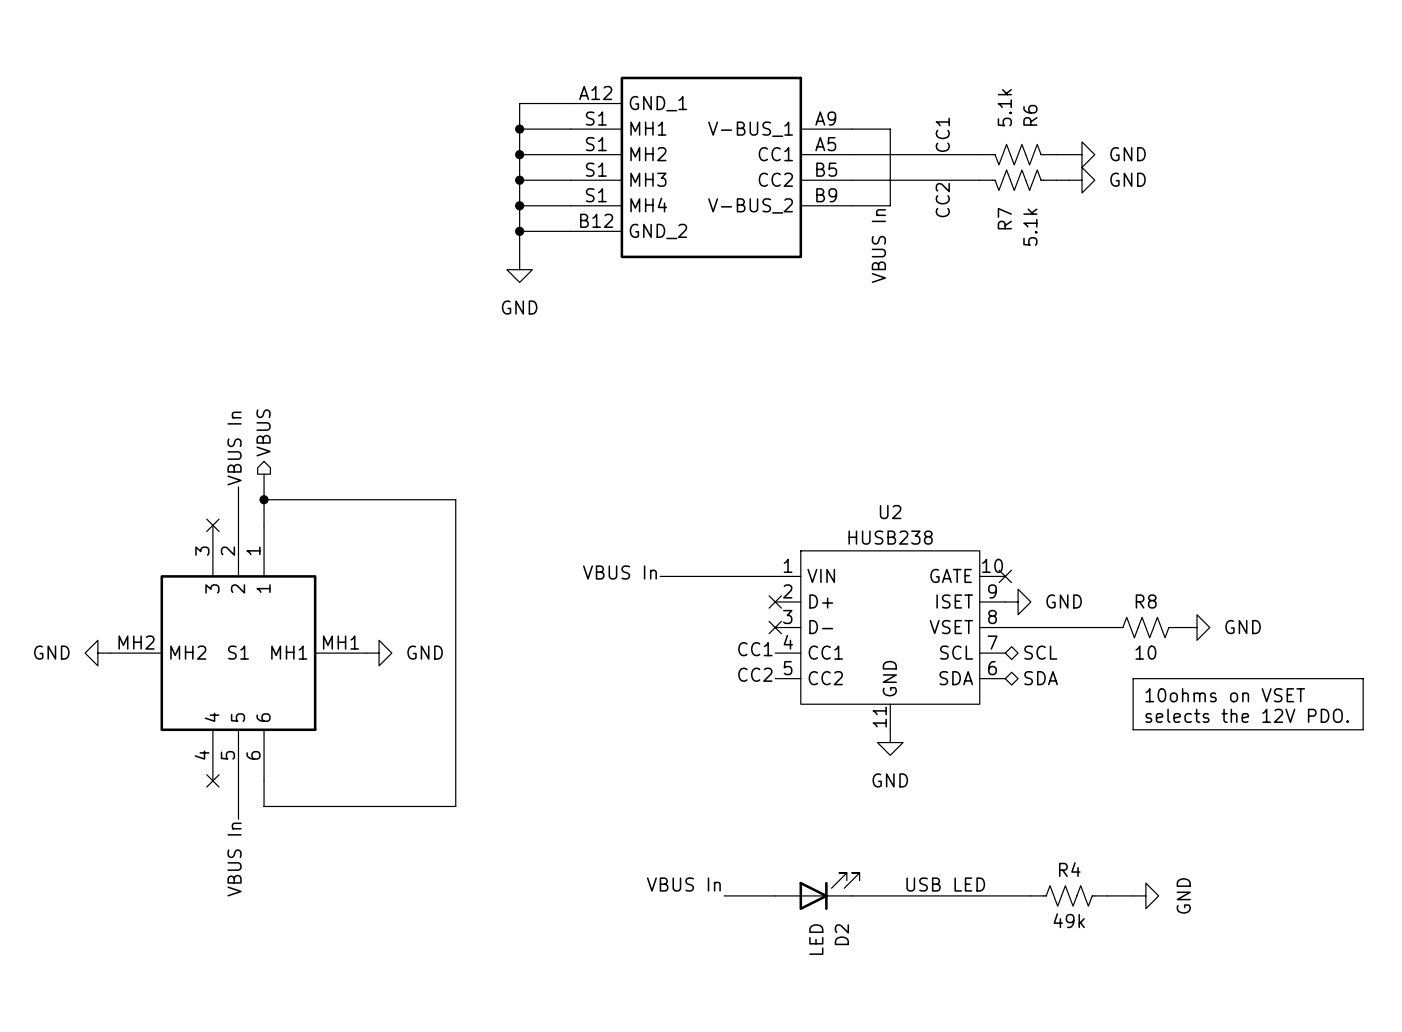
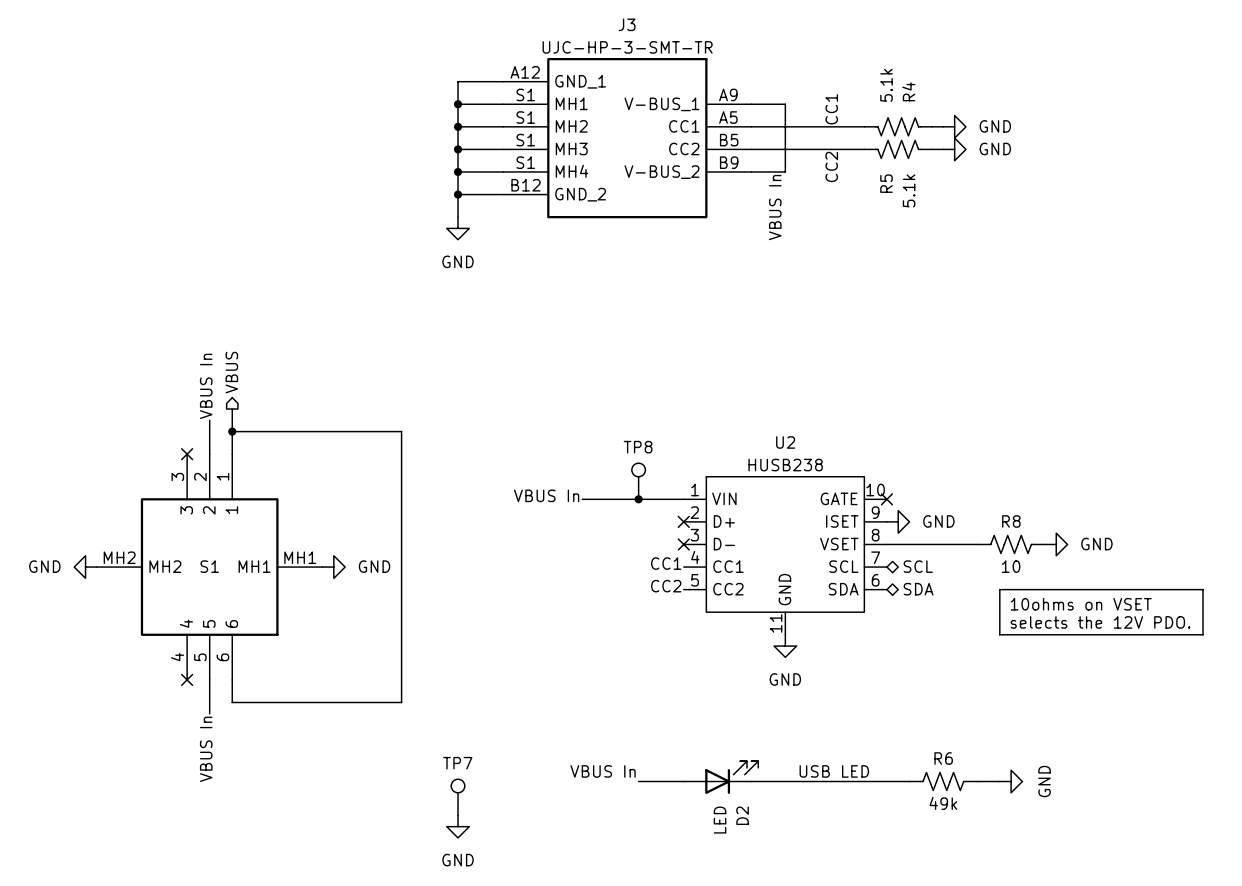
J3 name: none -> J3 (627, 24)
J3 value: none -> UJC-HP-3-SMT-TR (627, 47)
R6 name: R6 (1030, 115) -> R4 (908, 91)
R7 name: R7 (1004, 218) -> R5 (886, 183)
TP8: none -> (638, 481)
junction: none -> (638, 499)
R4 name: R4 (1069, 869) -> R6 (943, 758)
TP7: none -> (458, 797)
power symbol: none -> GND (458, 826)

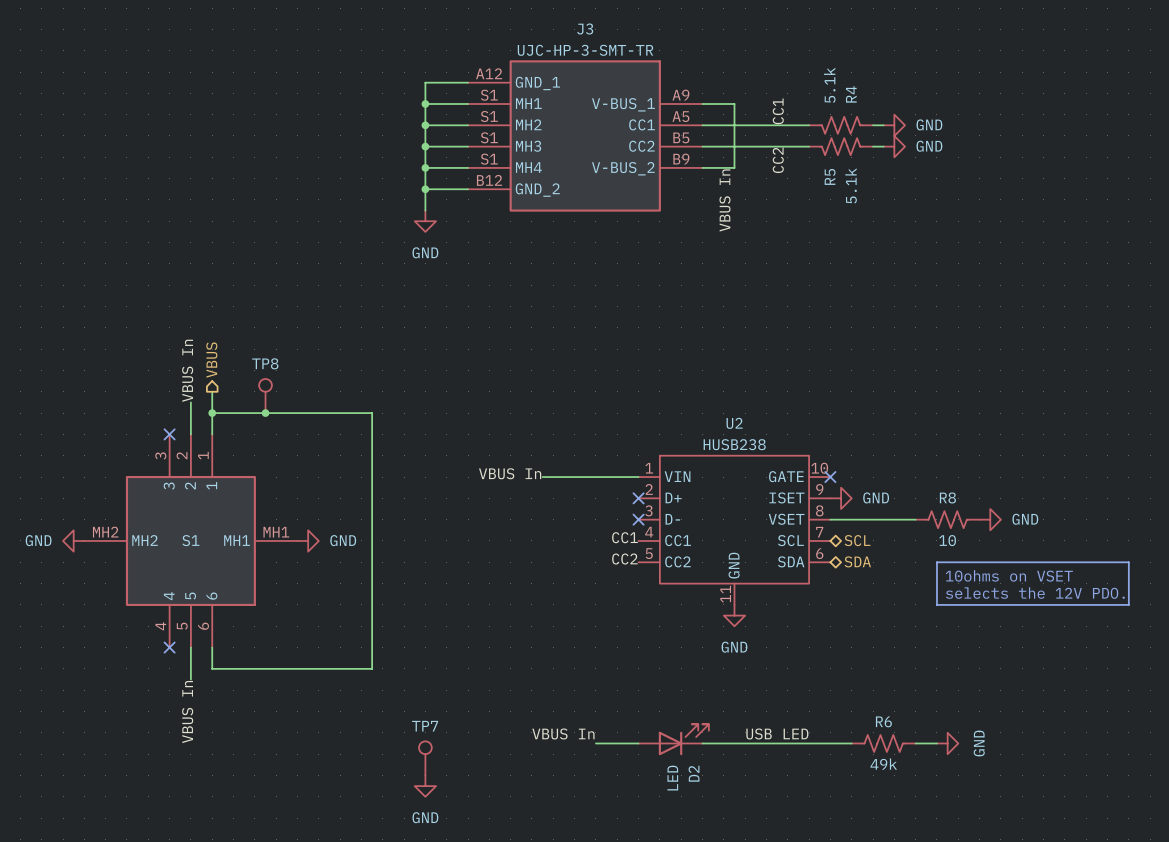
junction: none -> (265, 413)
TP8 position: (638, 481) -> (265, 396)
junction: (638, 499) -> none

